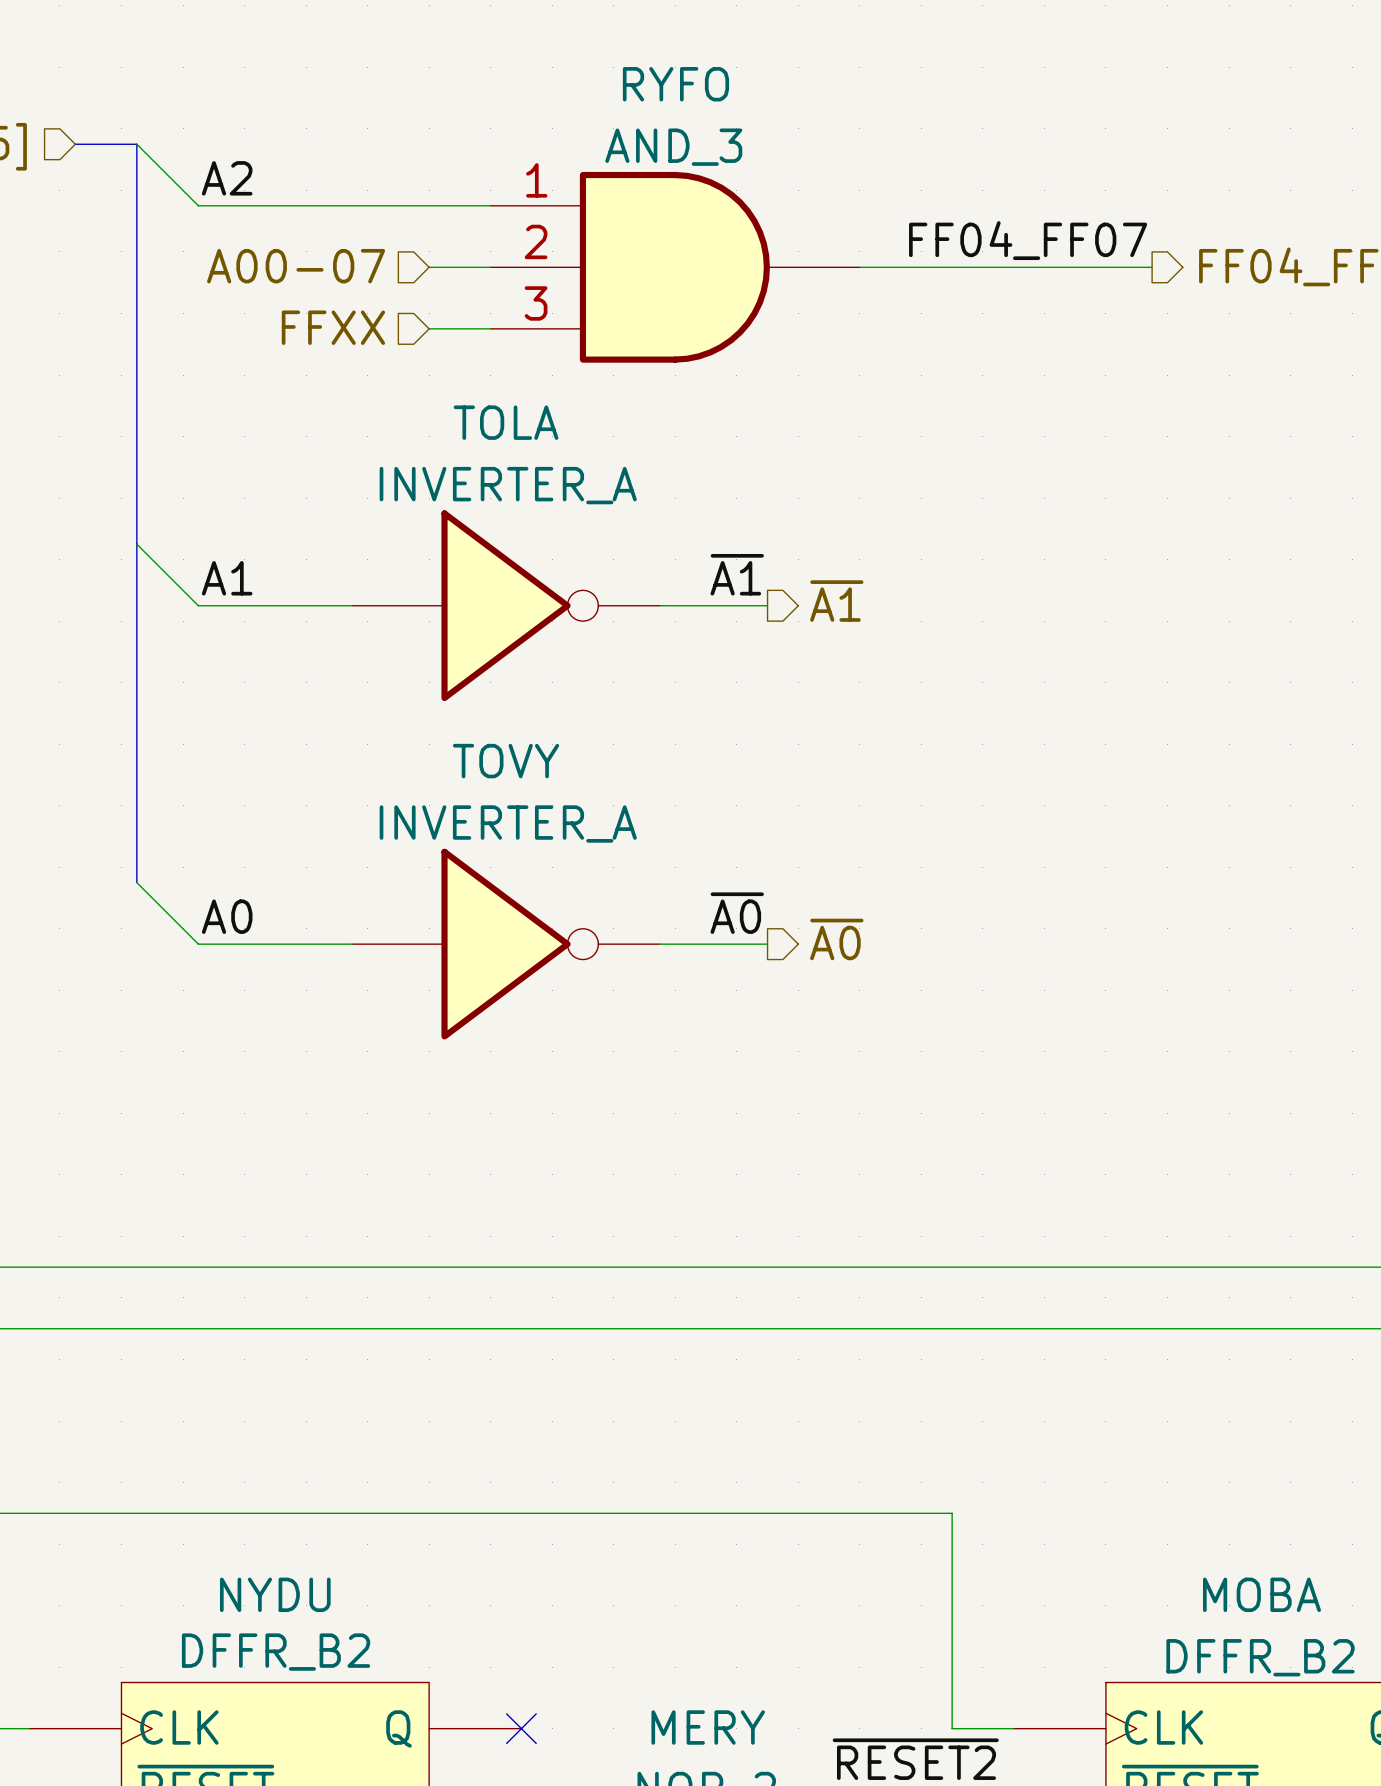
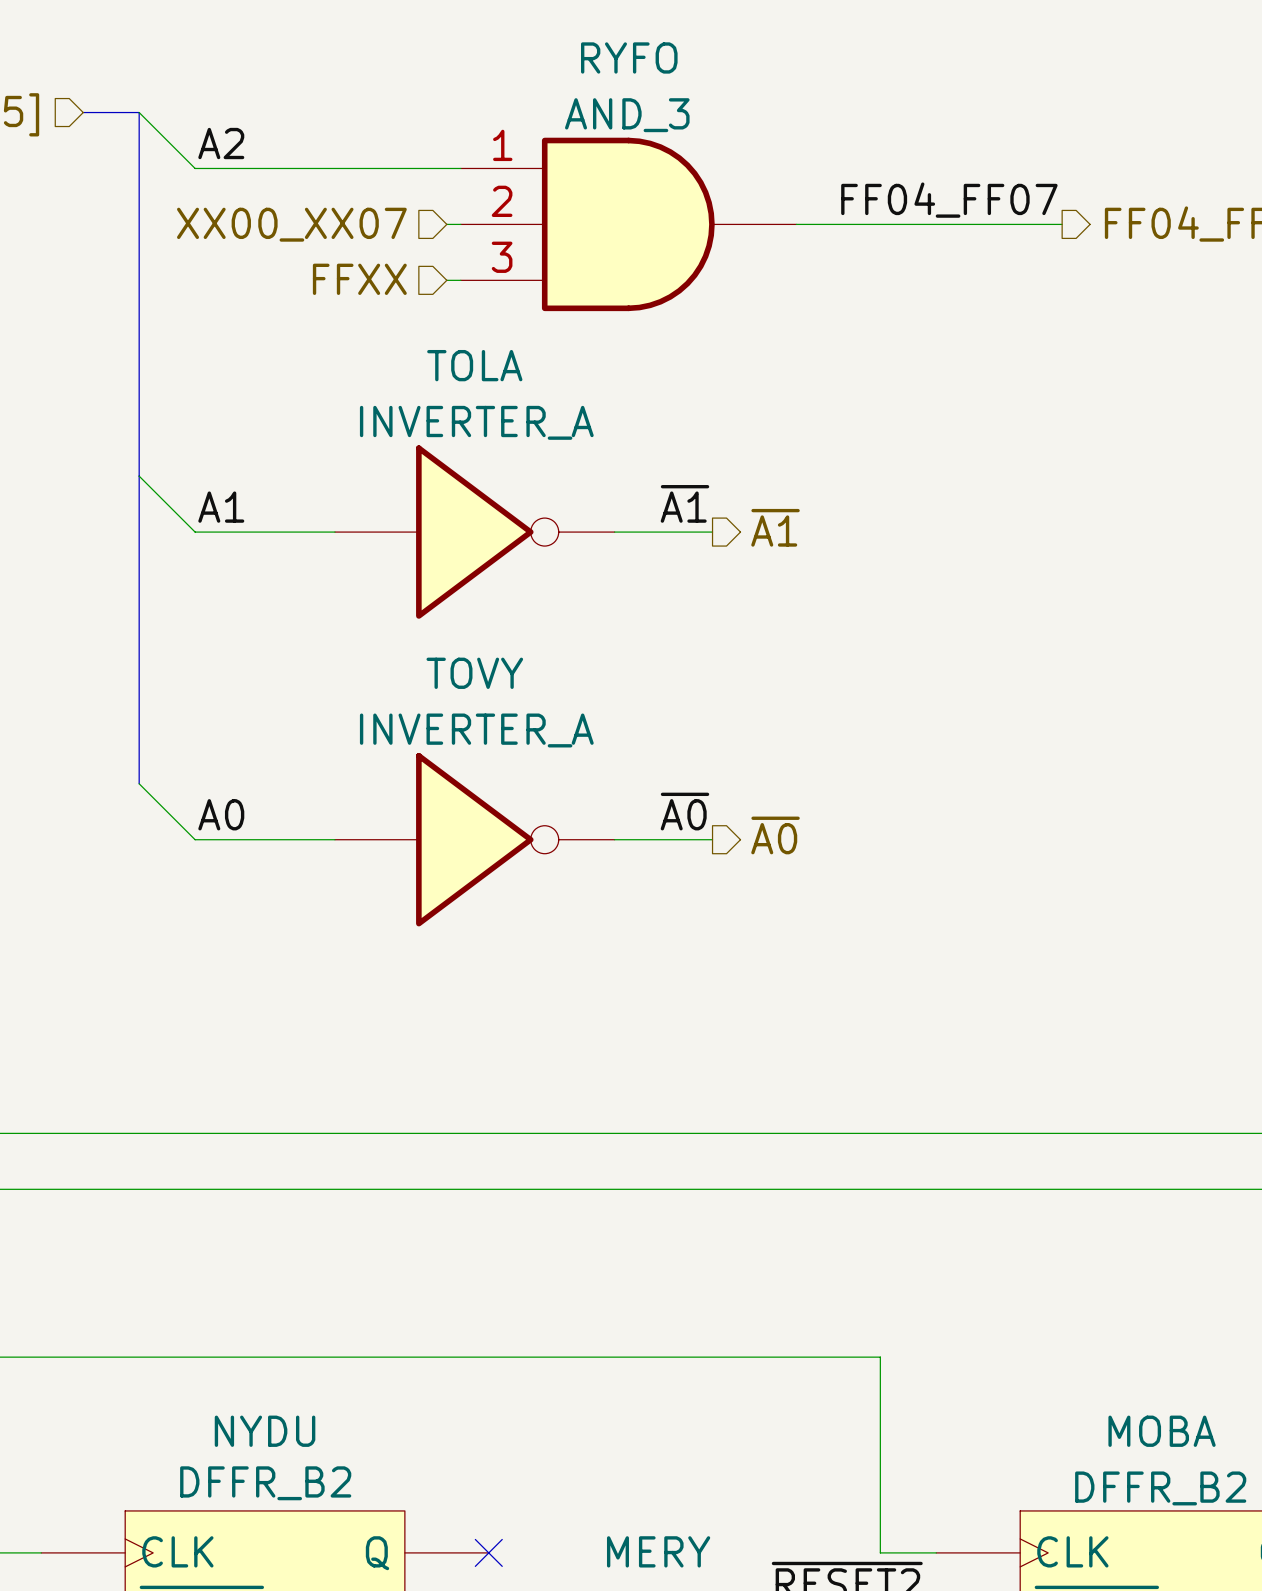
hierarchical label: A00-07 (296, 266) -> none
hierarchical label: none -> XX00_XX07 (291, 224)
wire: (429, 267) (475, 267) -> none
hierarchical label position: FFXX (333, 327) -> FFXX (359, 279)
wire: (429, 328) (475, 328) -> none

